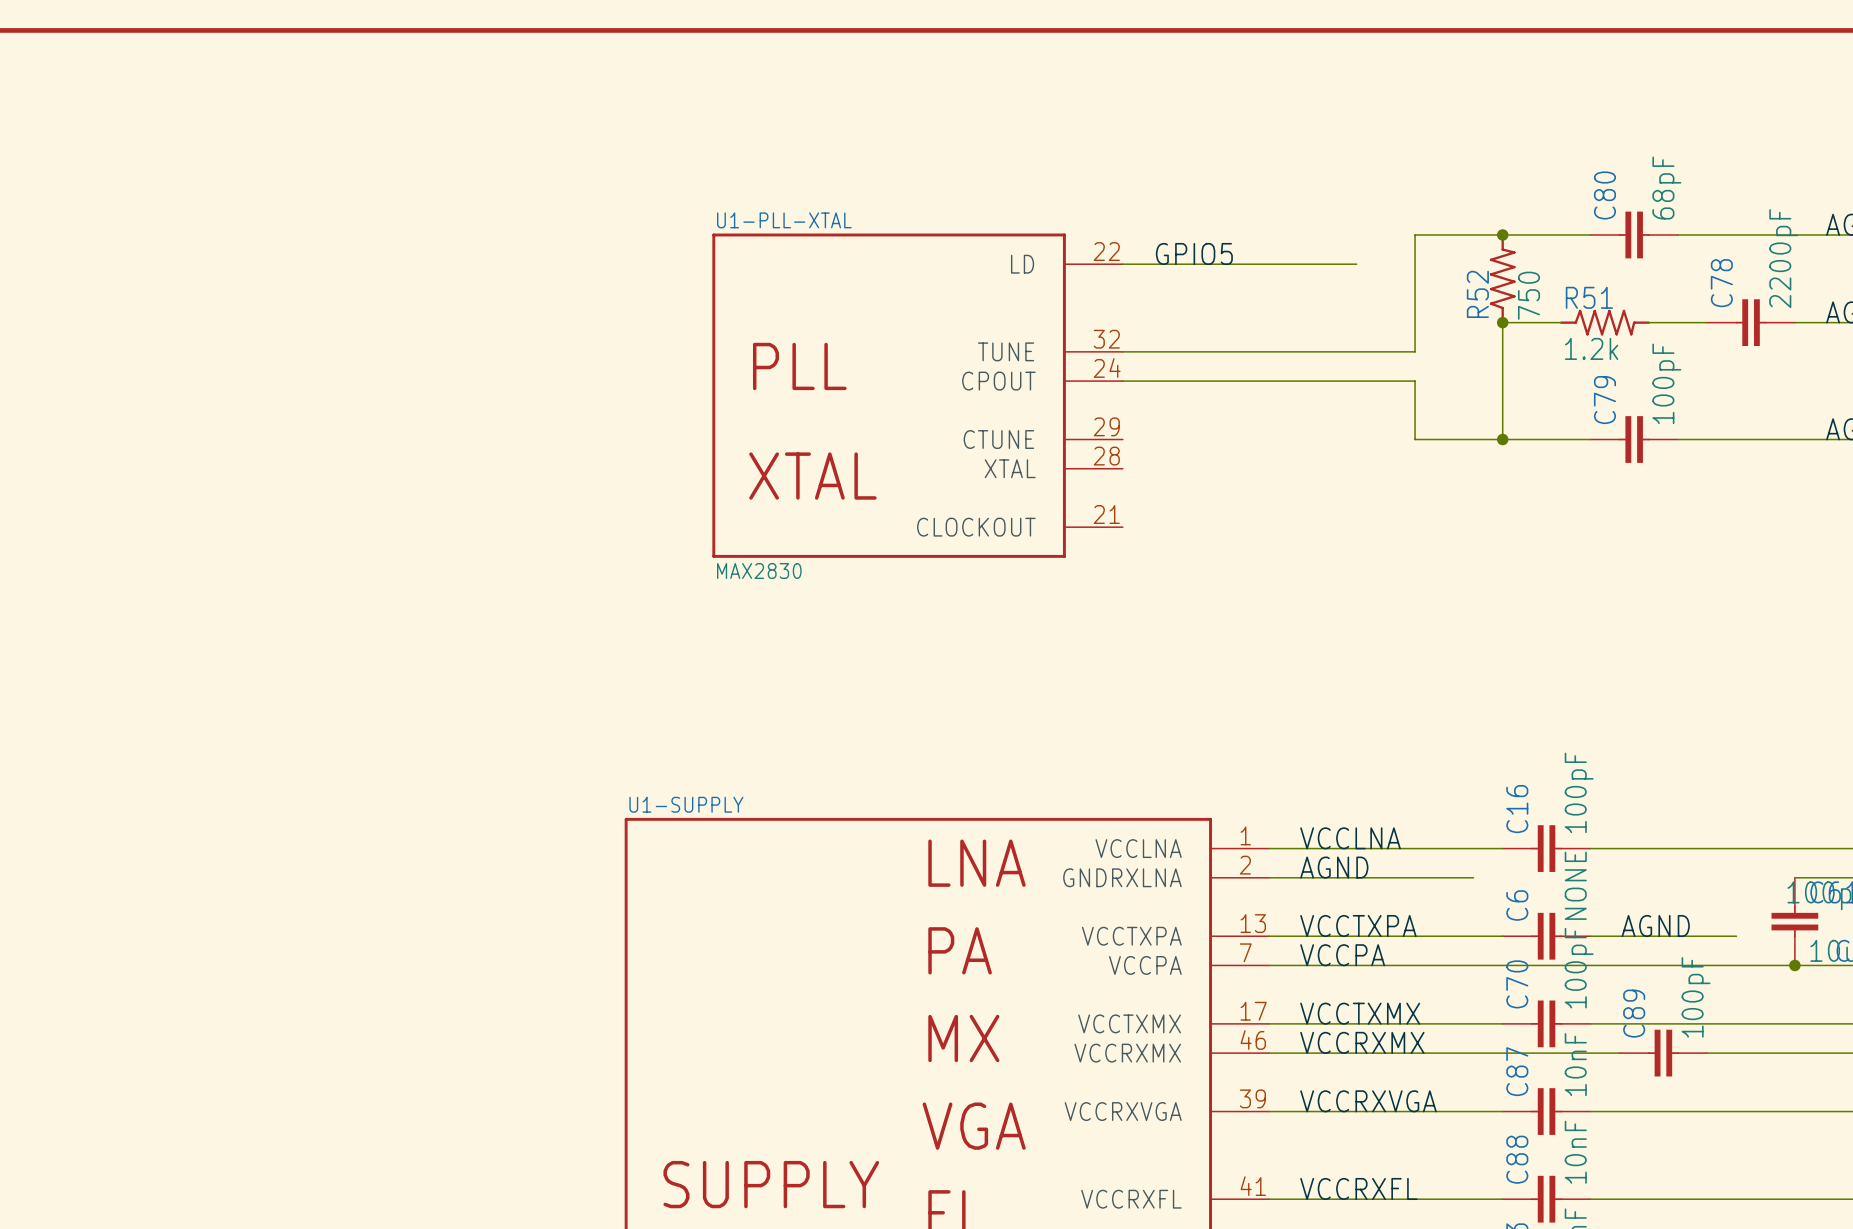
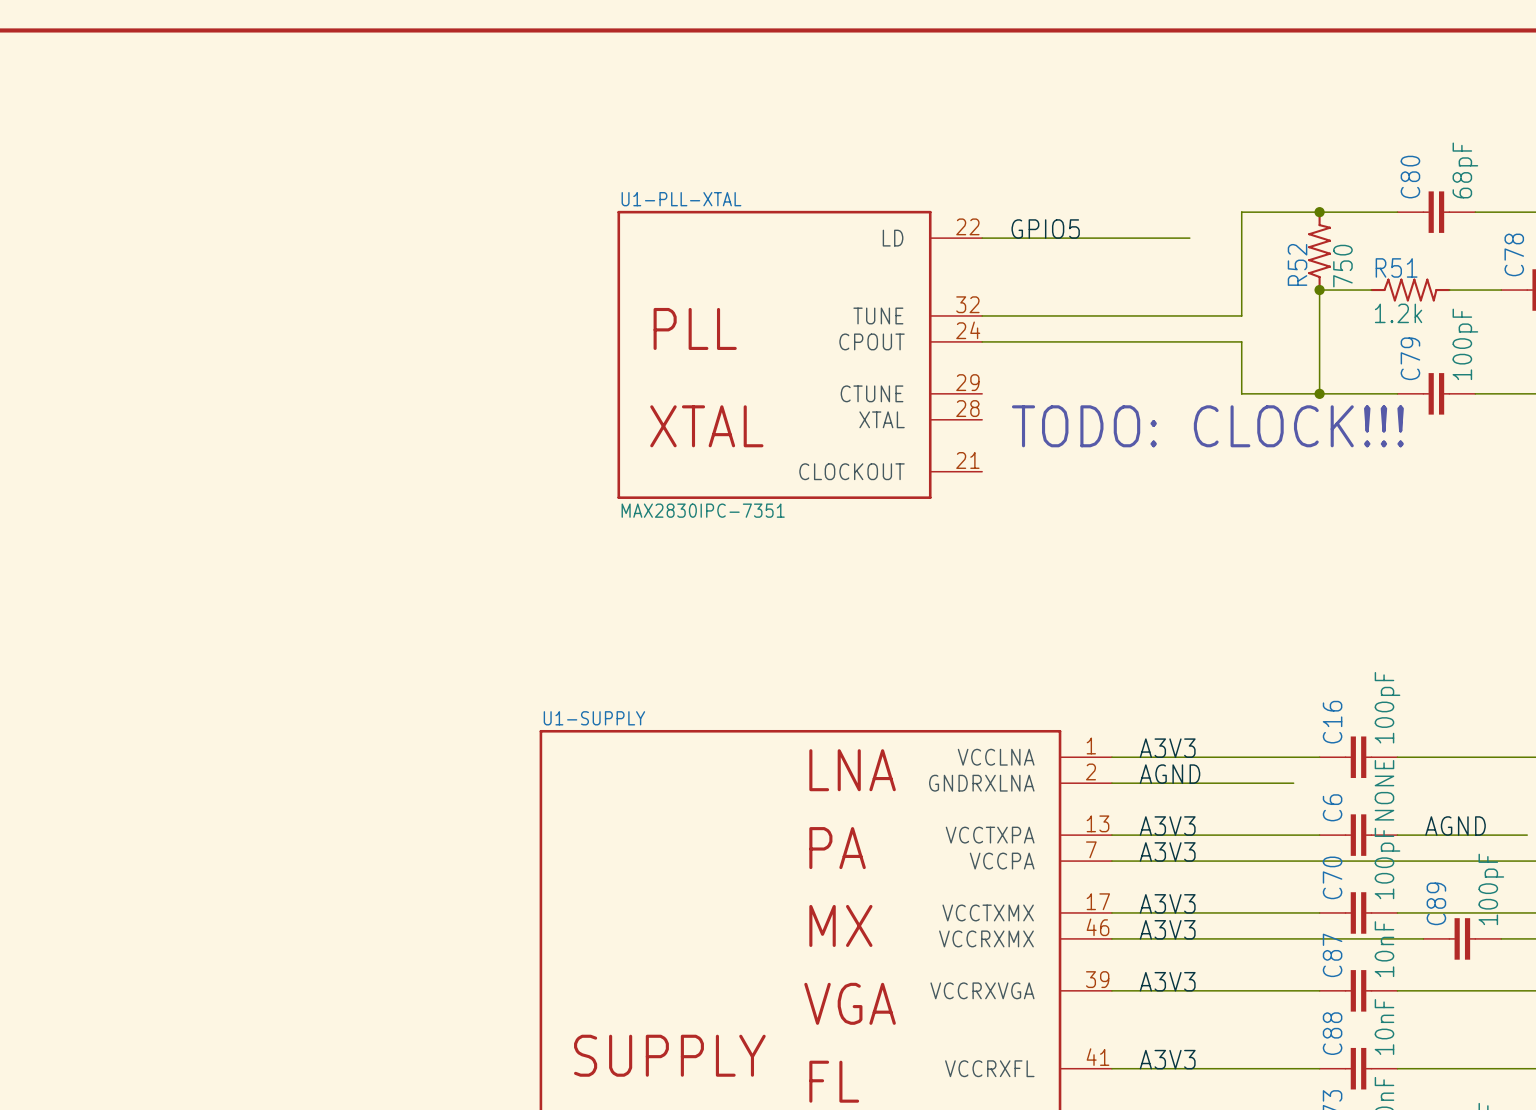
text: none -> TODO: CLOCK!!! (1207, 426)
U1-PLL-XTAL value: MAX2830 (759, 571) -> MAX2830IPC-7351 (703, 510)
label: VCCLNA (1350, 838) -> A3V3 (1167, 748)
label: VCCTXPA (1358, 926) -> A3V3 (1167, 826)
label: VCCPA (1342, 955) -> A3V3 (1167, 851)
label: VCCTXMX (1360, 1013) -> A3V3 (1167, 903)
label: VCCRXMX (1362, 1042) -> A3V3 (1167, 929)
label: VCCRXVGA (1368, 1101) -> A3V3 (1167, 981)
label: VCCRXFL (1358, 1188) -> A3V3 (1167, 1059)

